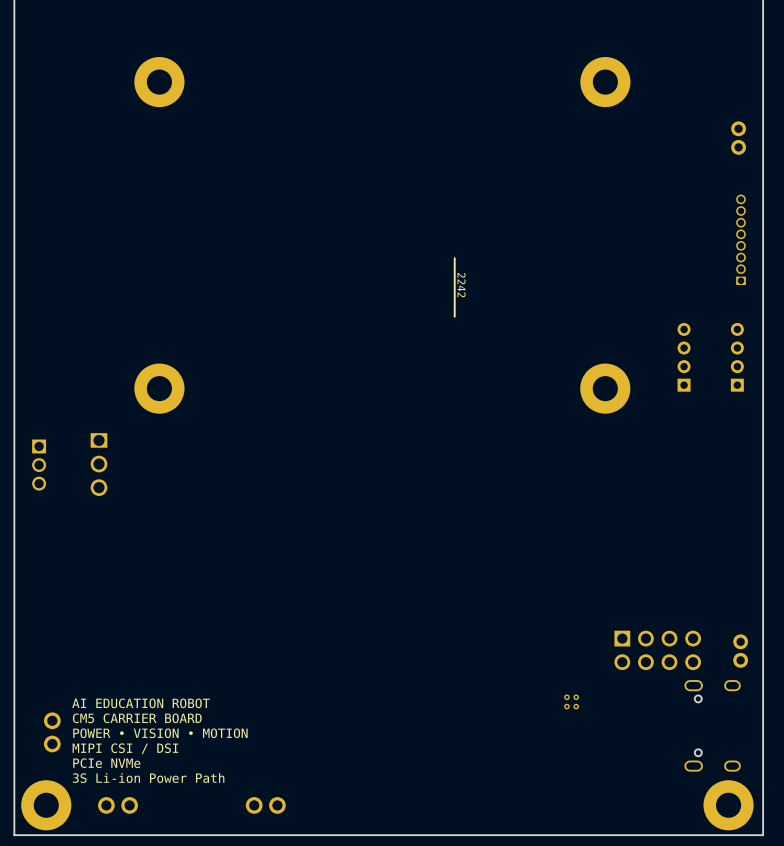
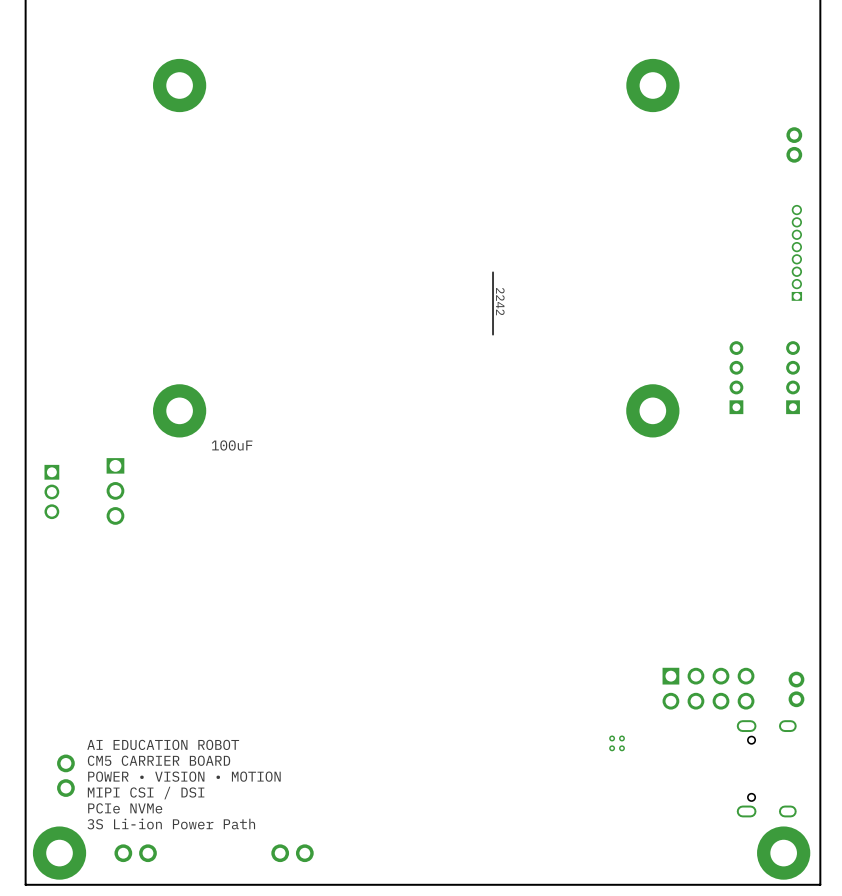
part: none -> 100uF (232, 445)

